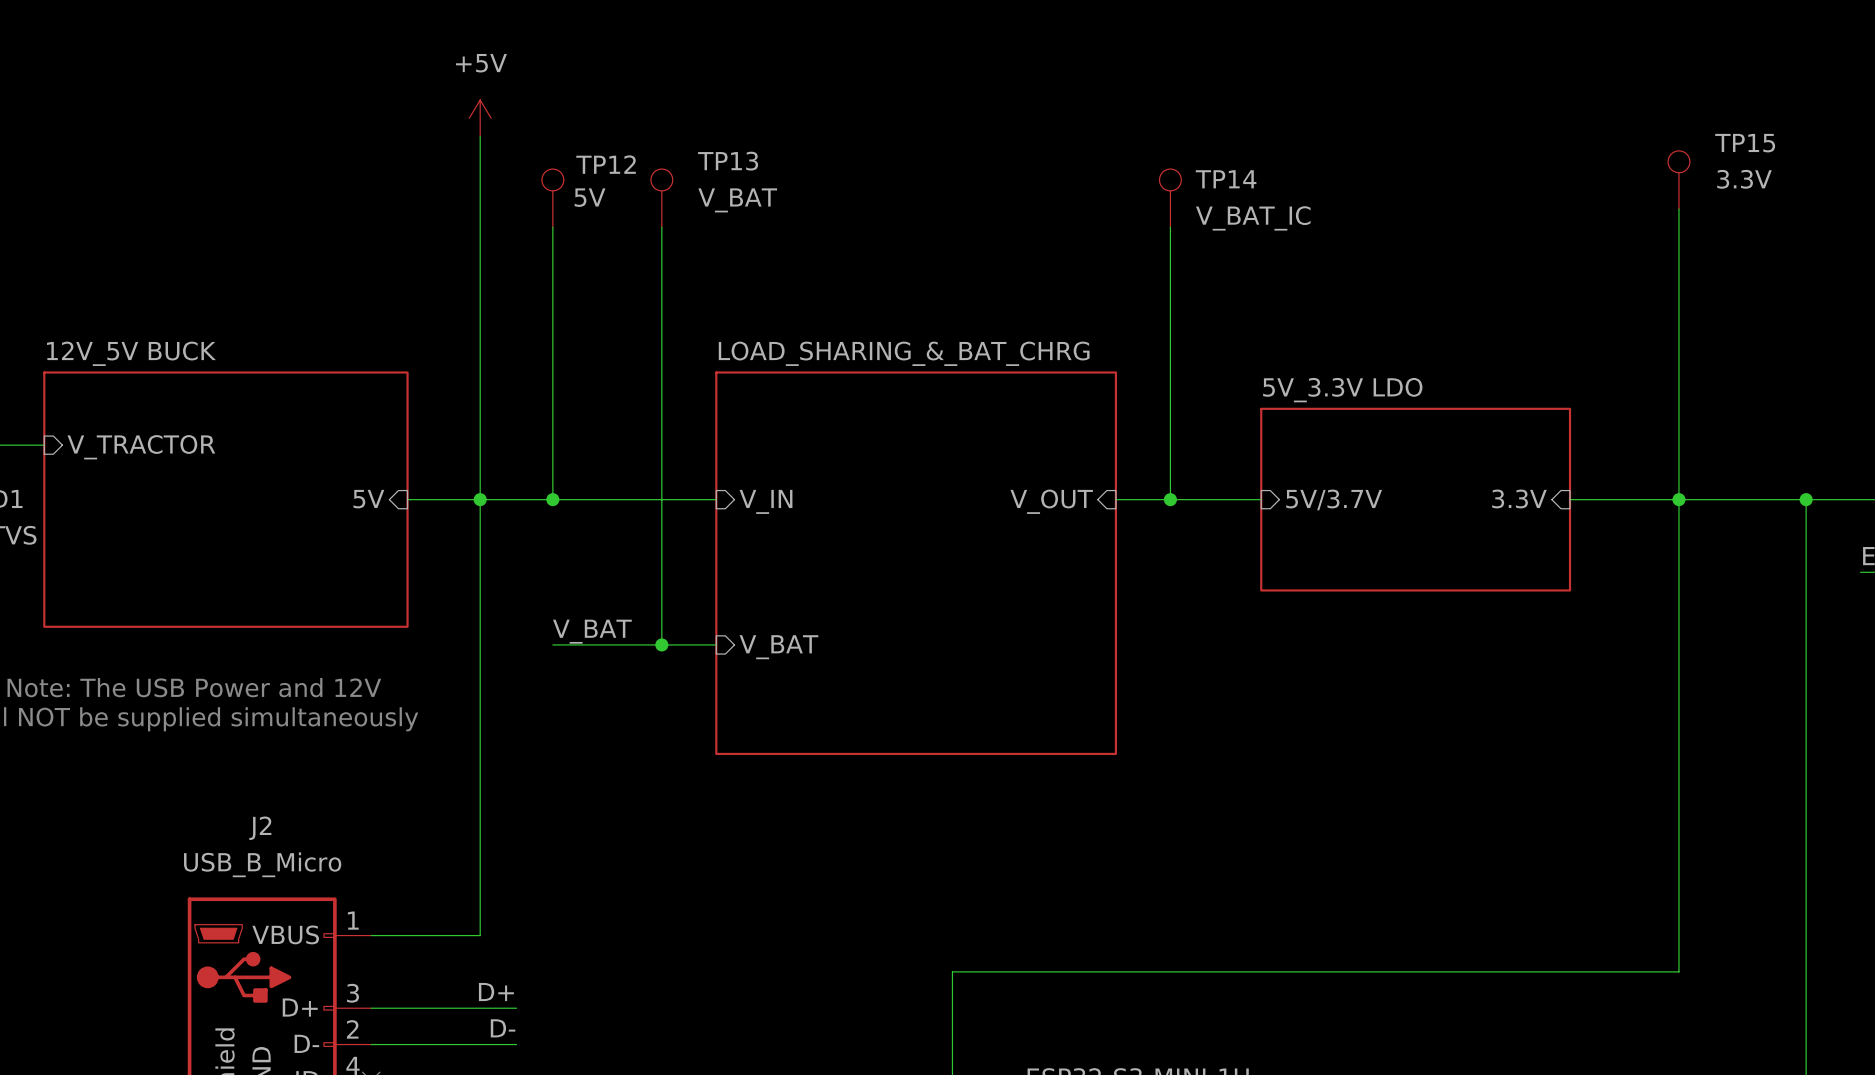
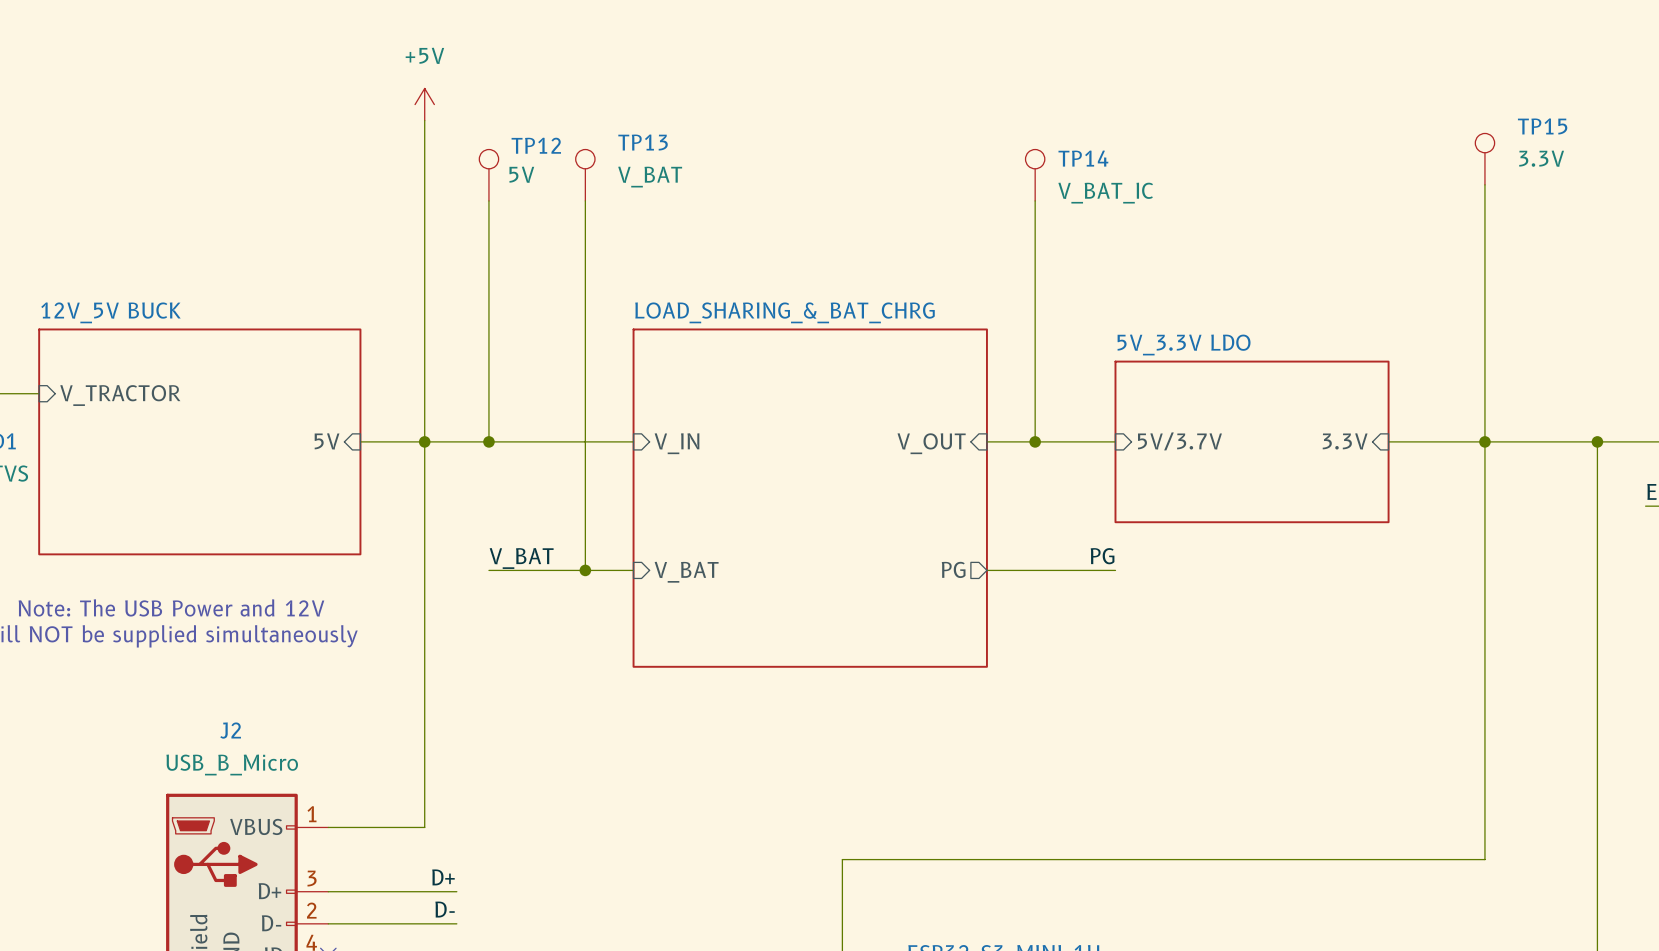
label: none -> PG (1102, 556)
sheet pin: none -> PG (953, 569)
wire: none -> (986, 570) (1115, 570)

